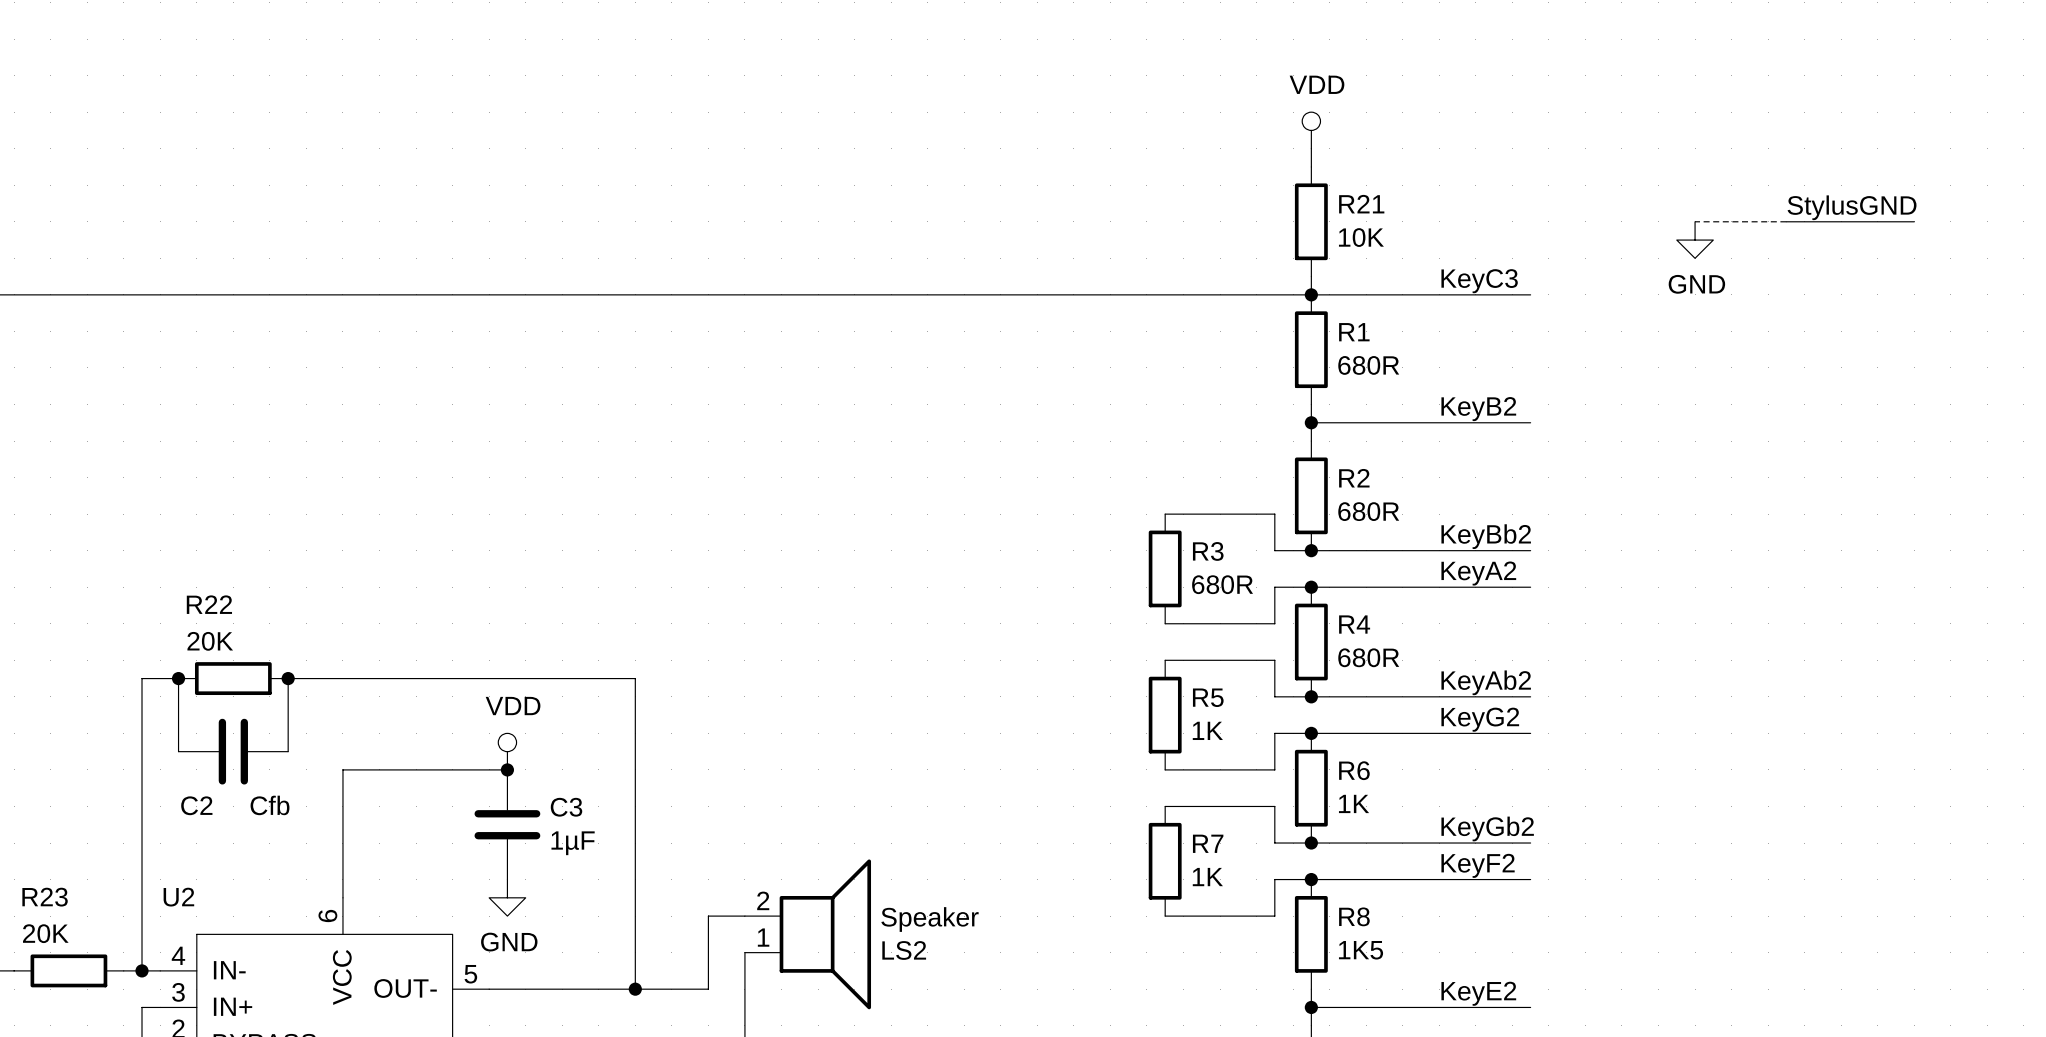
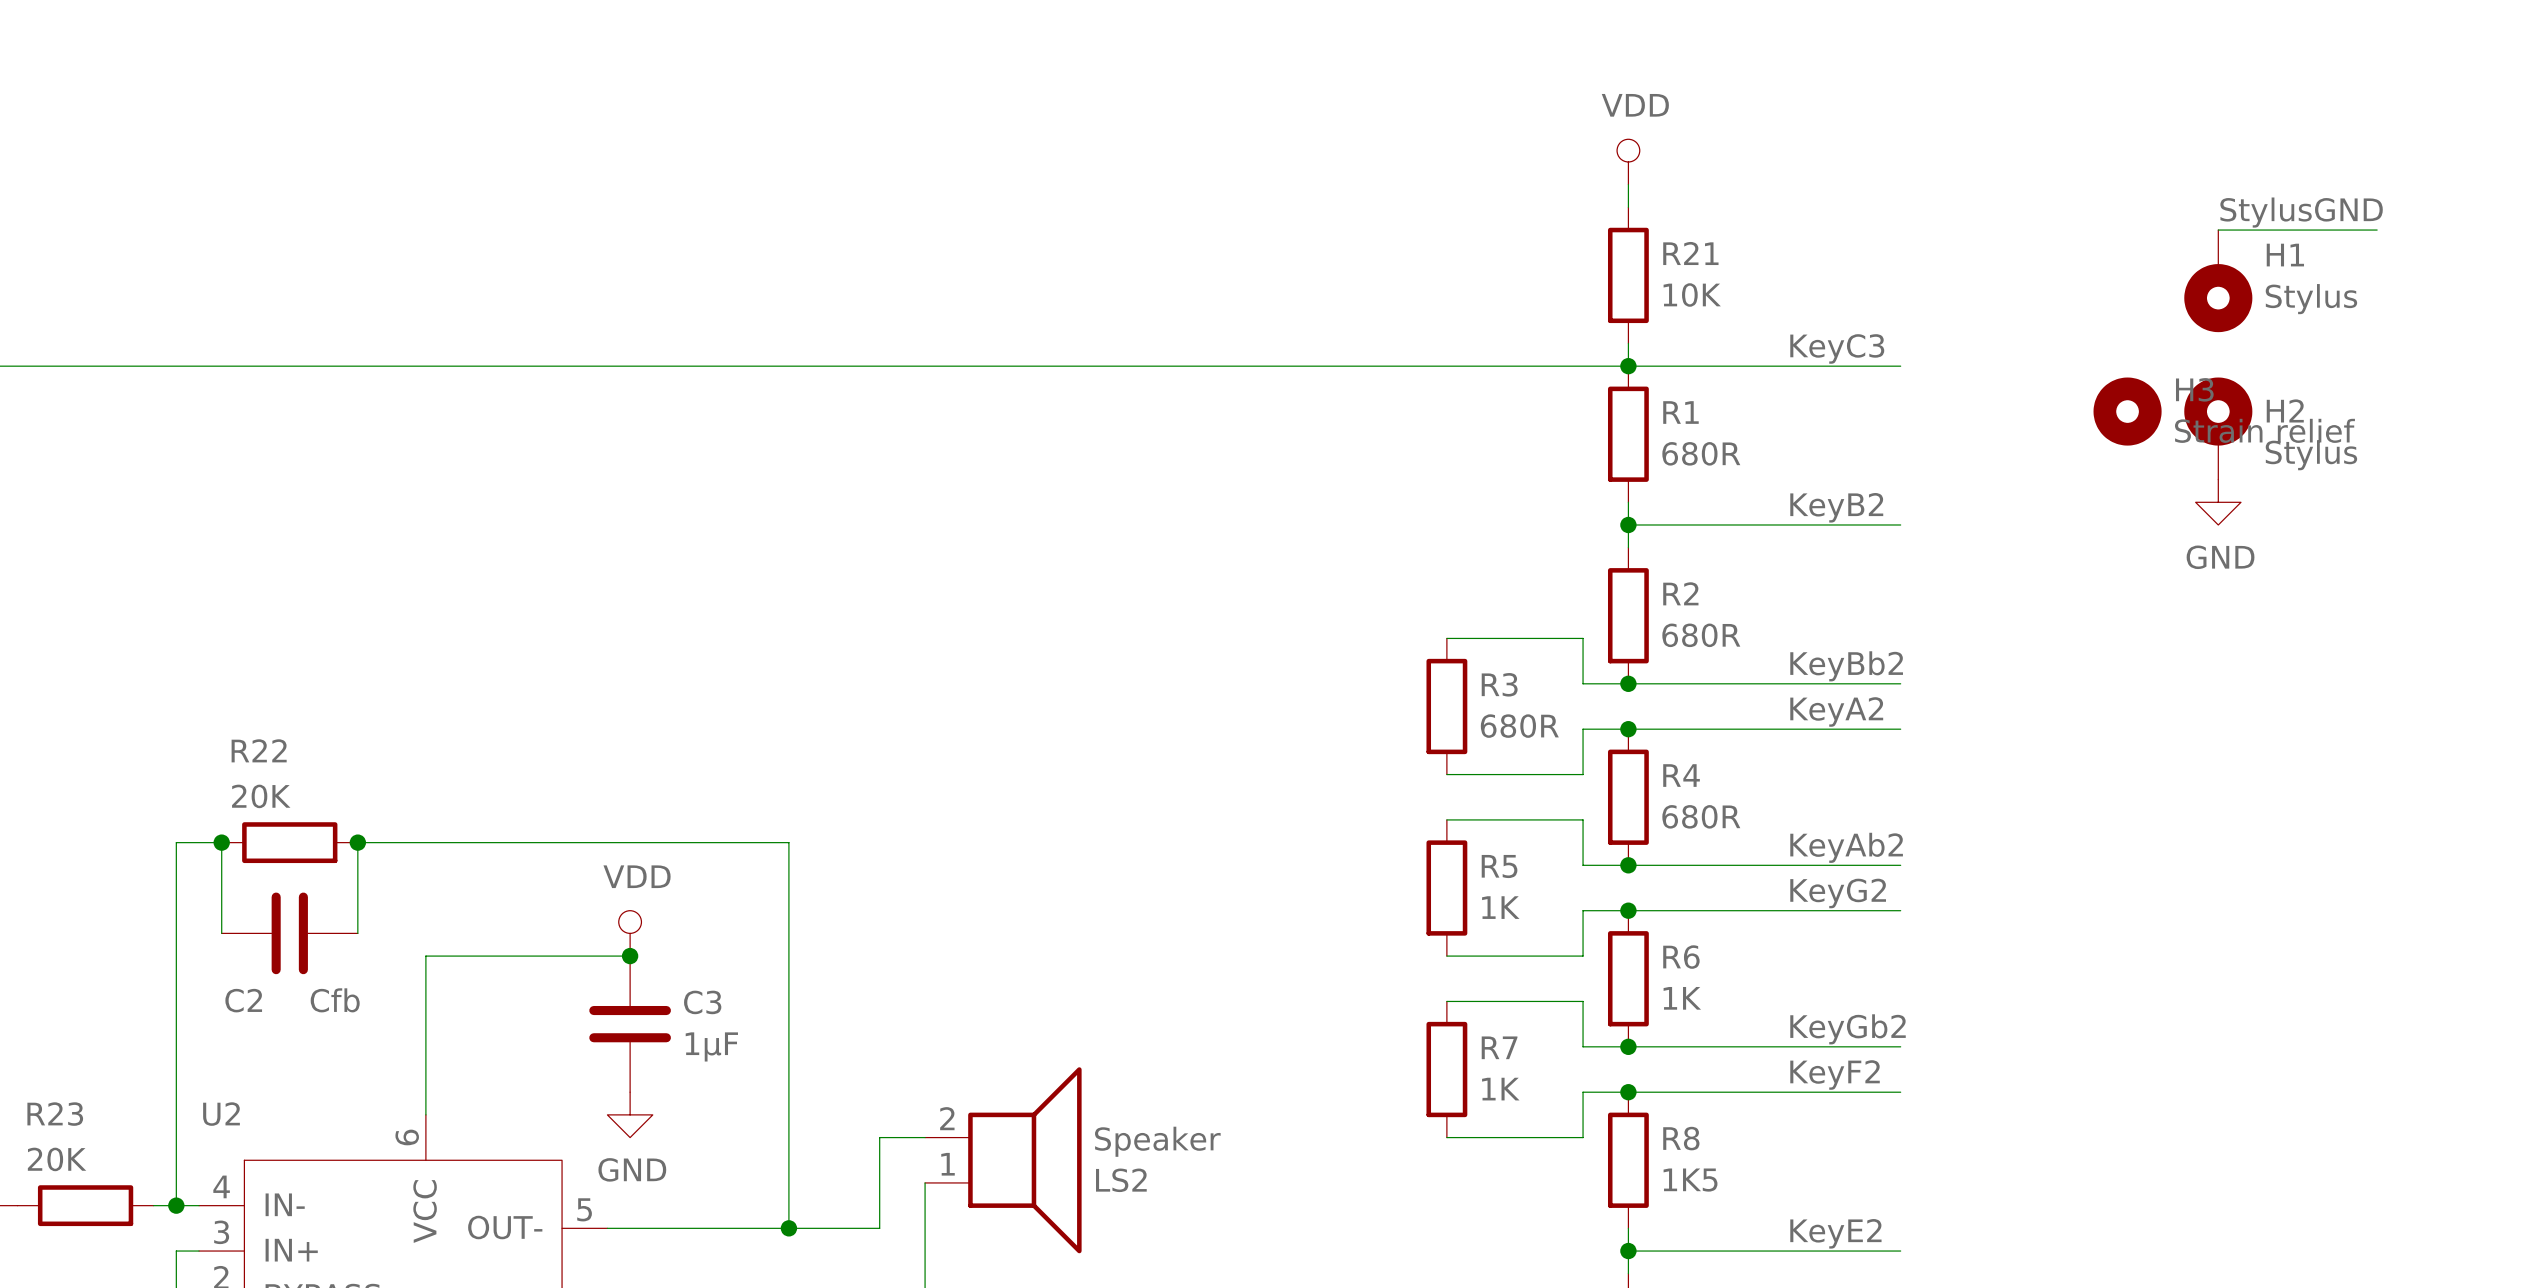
label position: StylusGND (1852, 207) -> StylusGND (2301, 212)
line: (1695, 221) (1786, 221) -> none
wire: (1786, 221) (1914, 221) -> (2218, 230) (2377, 230)
H1: none -> Stylus (2218, 281)
power symbol position: GND (1695, 240) -> GND (2218, 502)
H3: none -> Strain relief (2127, 411)
H2: none -> Stylus (2218, 428)

